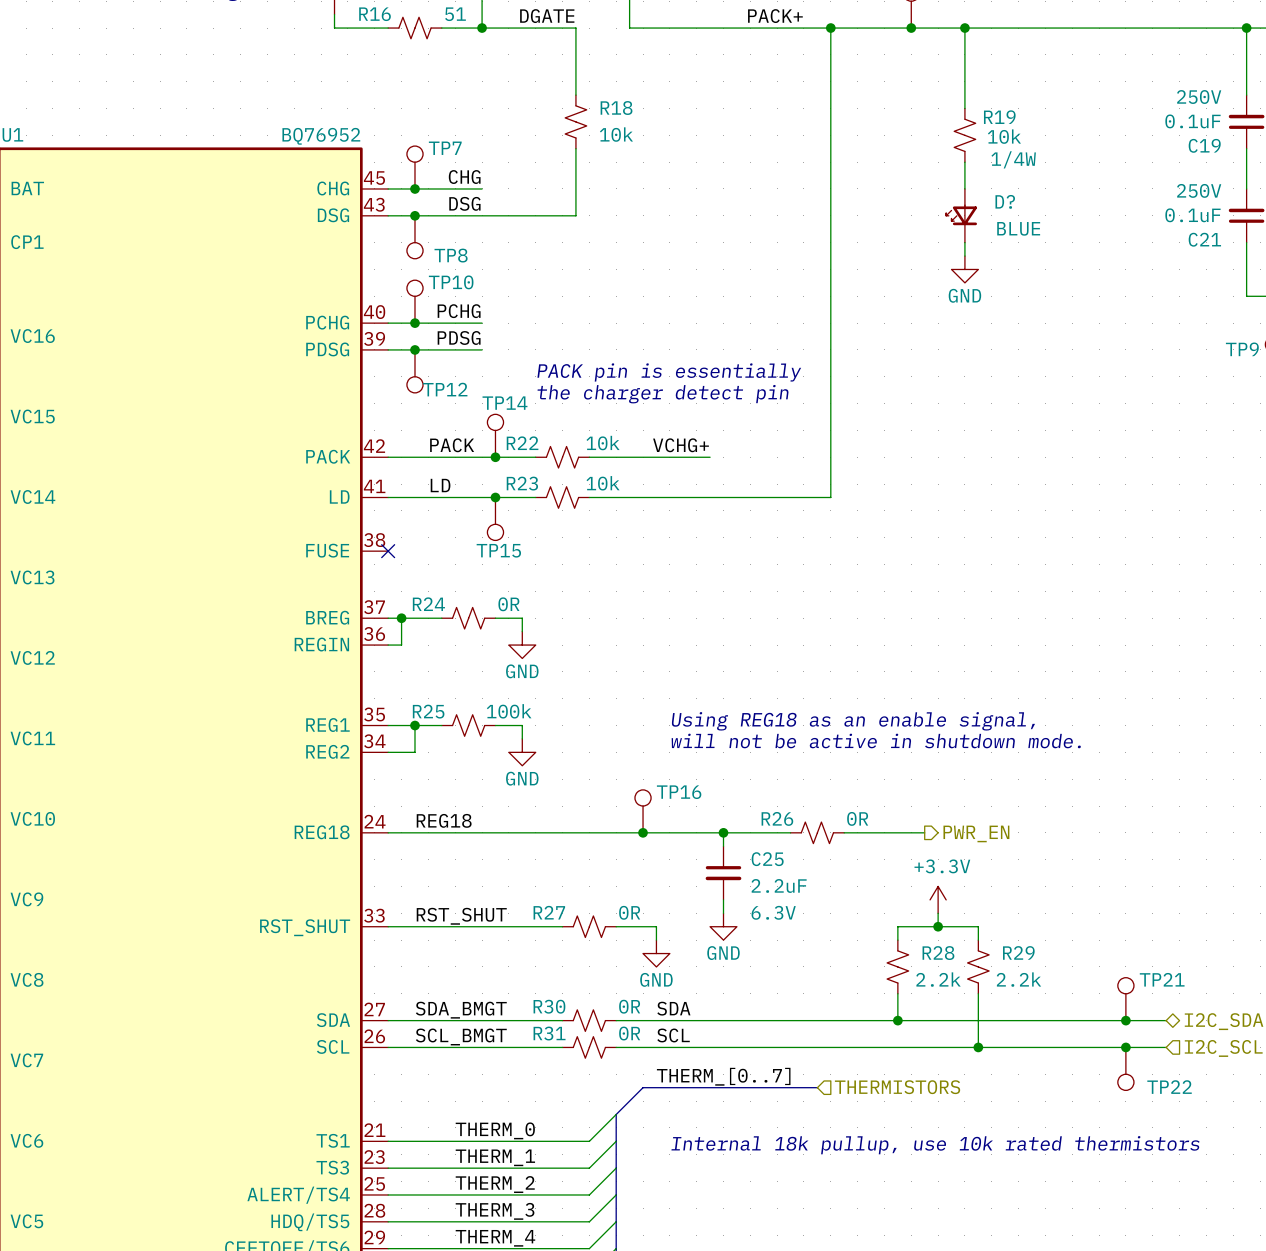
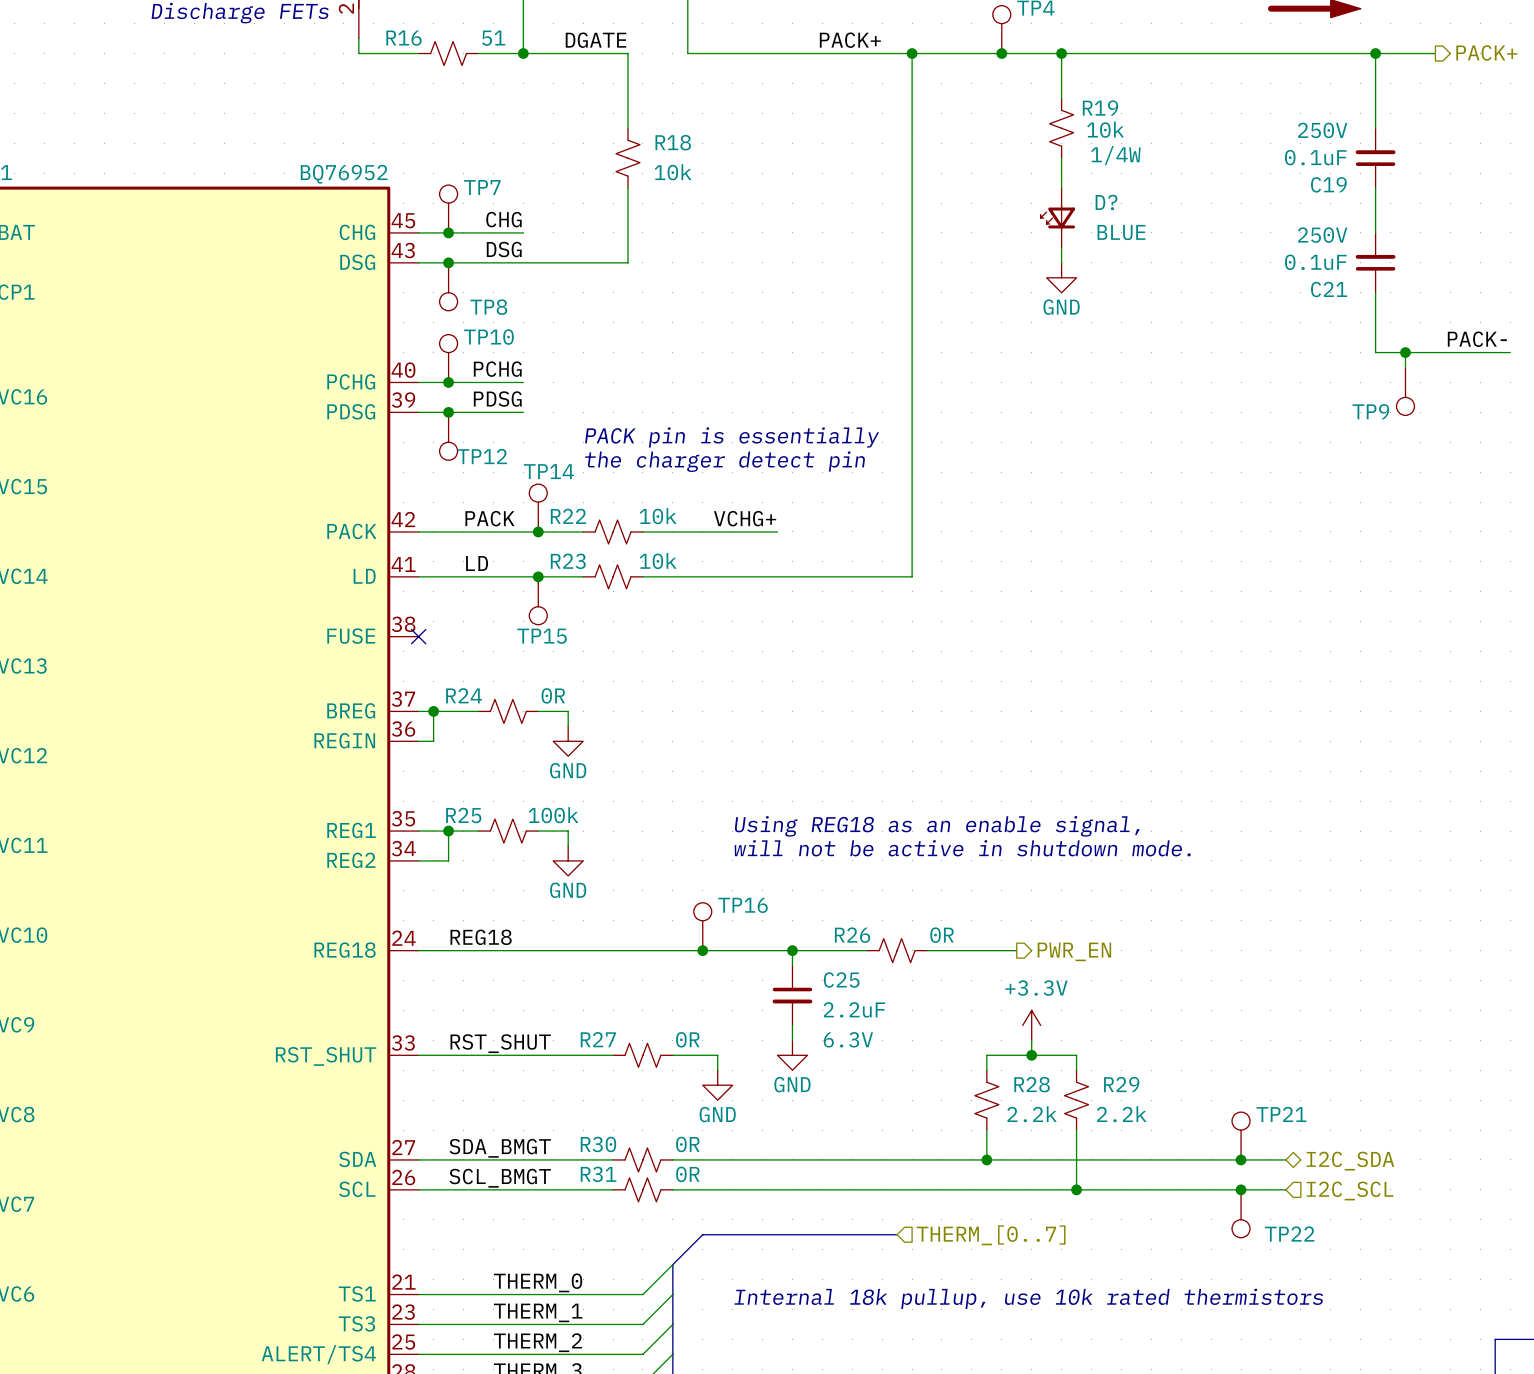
wire: (964, 68) (964, 108) -> none
R19 position: (964, 135) -> (1061, 128)
D? position: (961, 215) -> (1057, 218)
power symbol position: GND (964, 269) -> GND (1061, 277)
label: SDA (673, 1008) -> none
label: SCL (673, 1035) -> none
label: THERM_[0..7] (723, 1076) -> none
hierarchical label: THERMISTORS (897, 1087) -> THERM_[0..7] (991, 1235)

